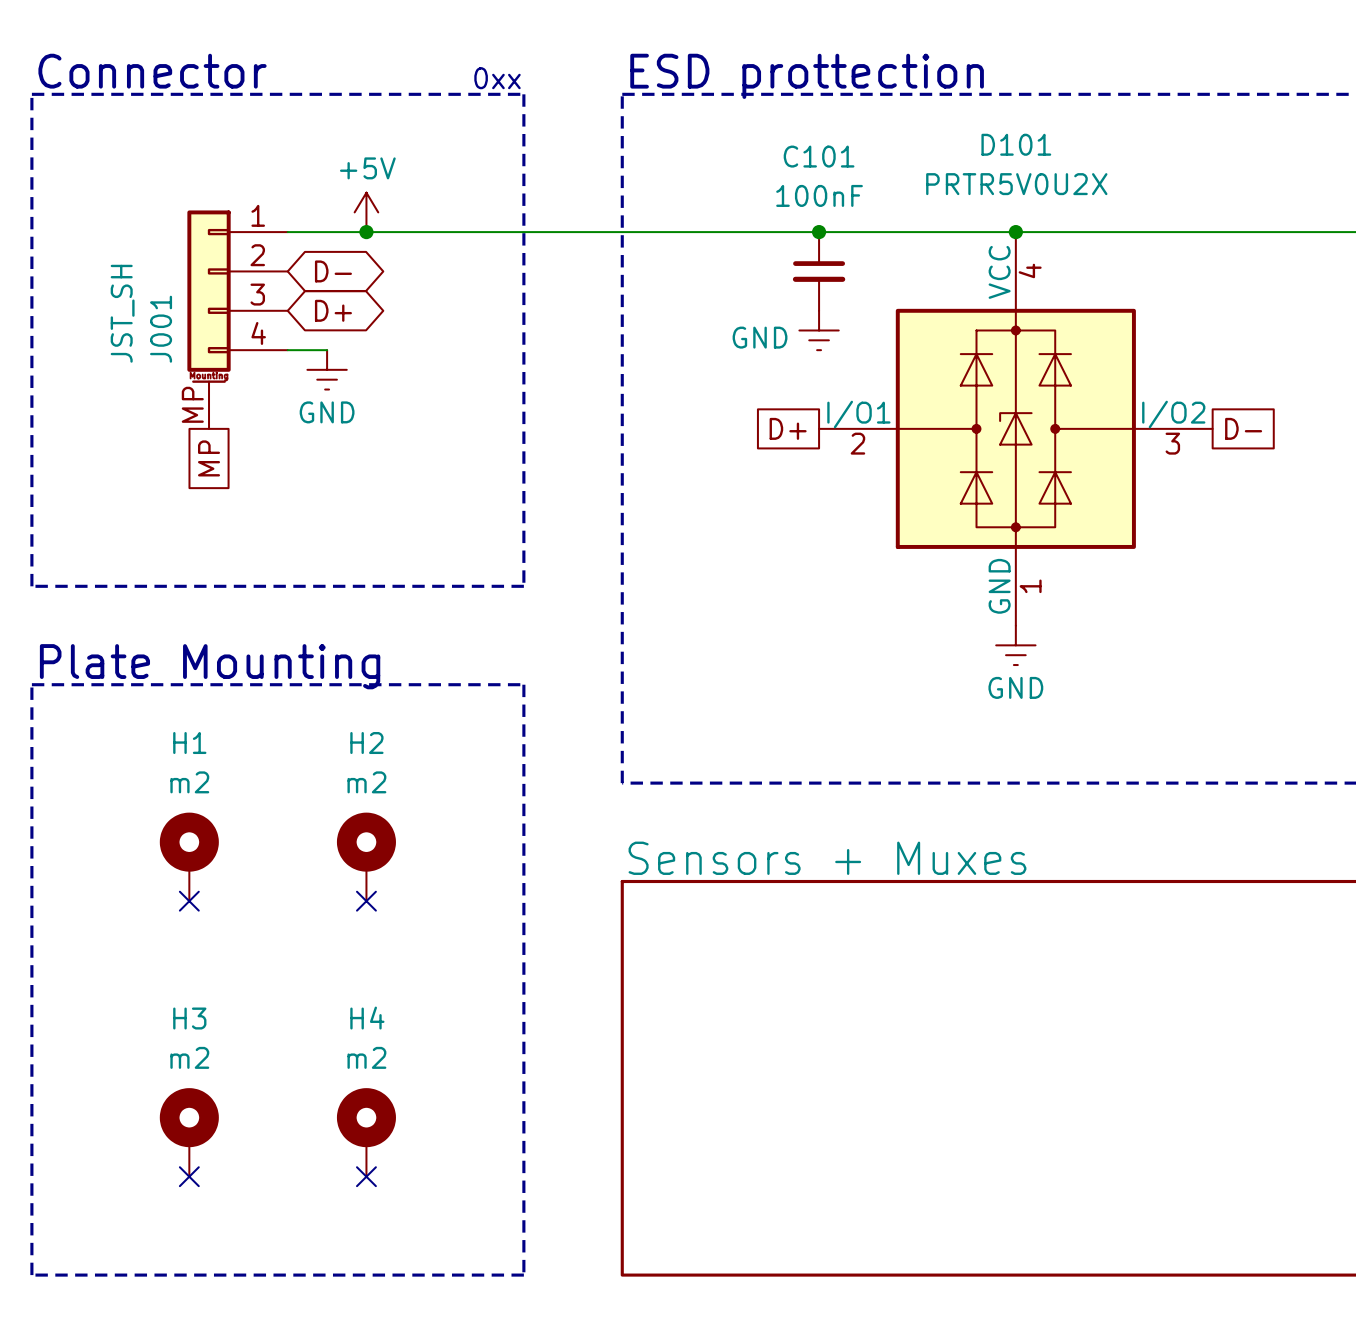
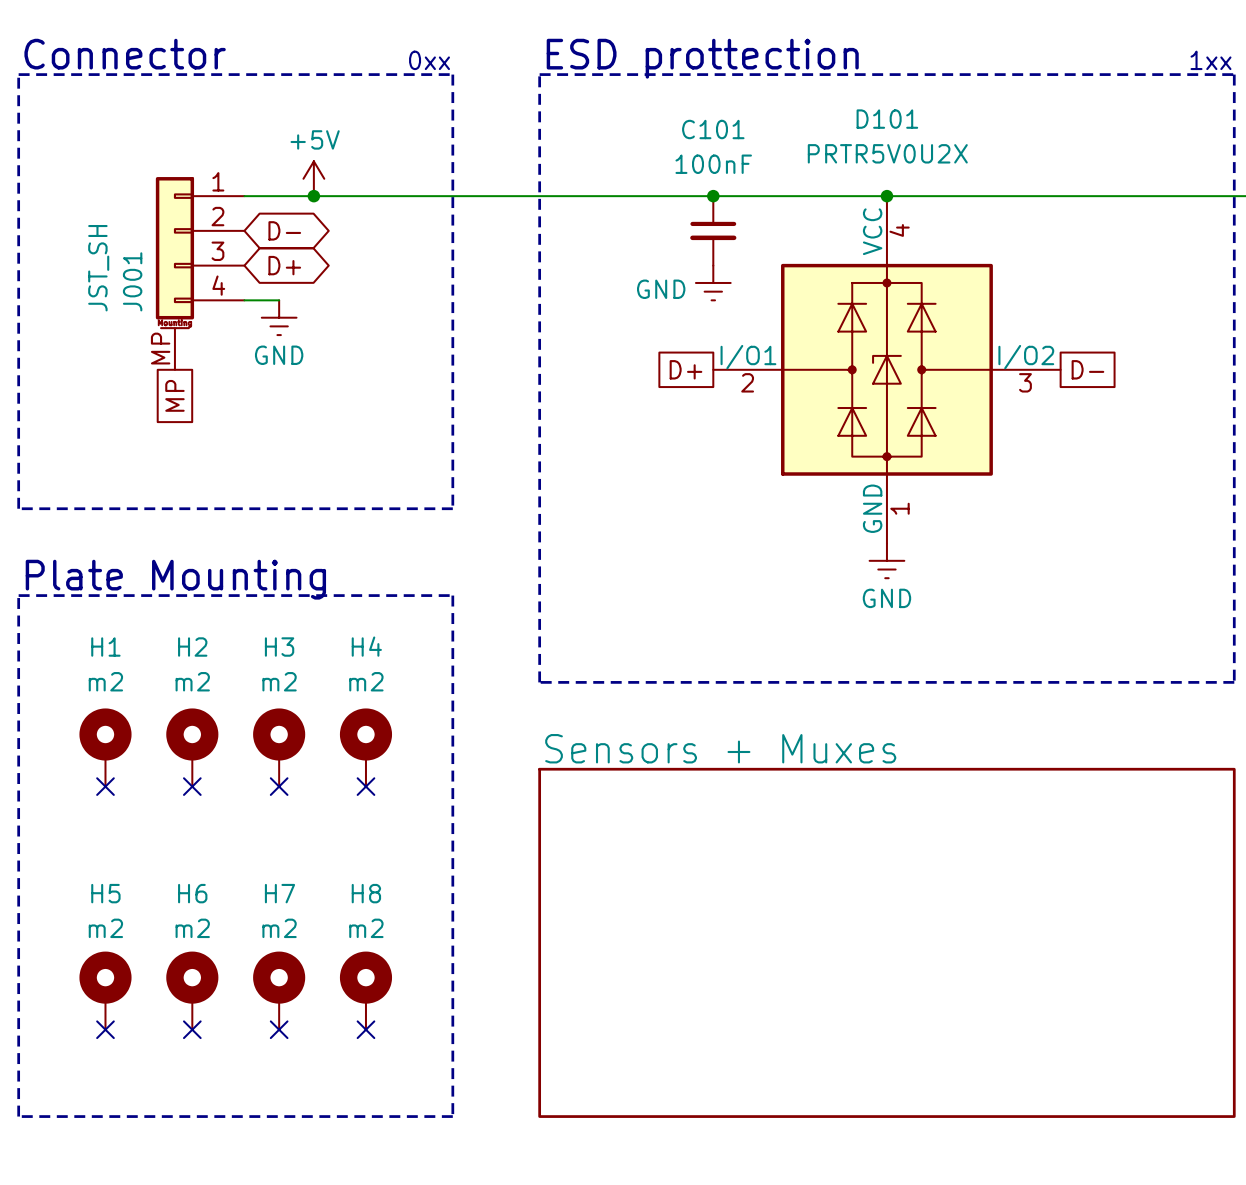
H1 position: (189, 856) -> (105, 747)
H2 position: (366, 856) -> (192, 747)
no-connect mark: none -> (105, 786)
no-connect mark: (189, 901) -> none
no-connect mark: none -> (192, 786)
no-connect mark: none -> (279, 786)
no-connect mark: (366, 901) -> none
no-connect mark: none -> (365, 786)
H5: none -> m2 (105, 990)
H3 position: (189, 1132) -> (279, 747)
H6: none -> m2 (192, 990)
H7: none -> m2 (279, 990)
H4 position: (366, 1132) -> (365, 747)
H8: none -> m2 (365, 990)
no-connect mark: none -> (105, 1029)
no-connect mark: (189, 1176) -> none
no-connect mark: none -> (192, 1029)
no-connect mark: none -> (279, 1029)
no-connect mark: (366, 1176) -> none
no-connect mark: none -> (365, 1029)

